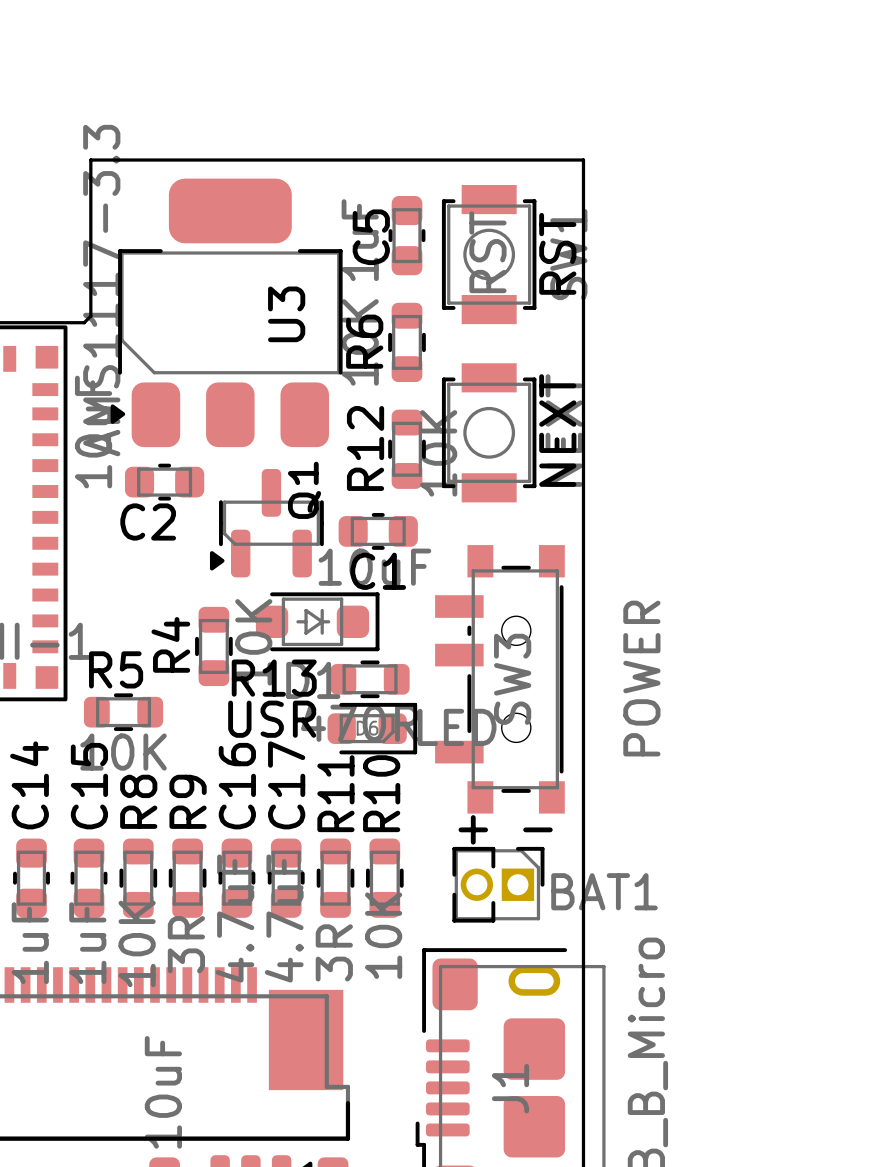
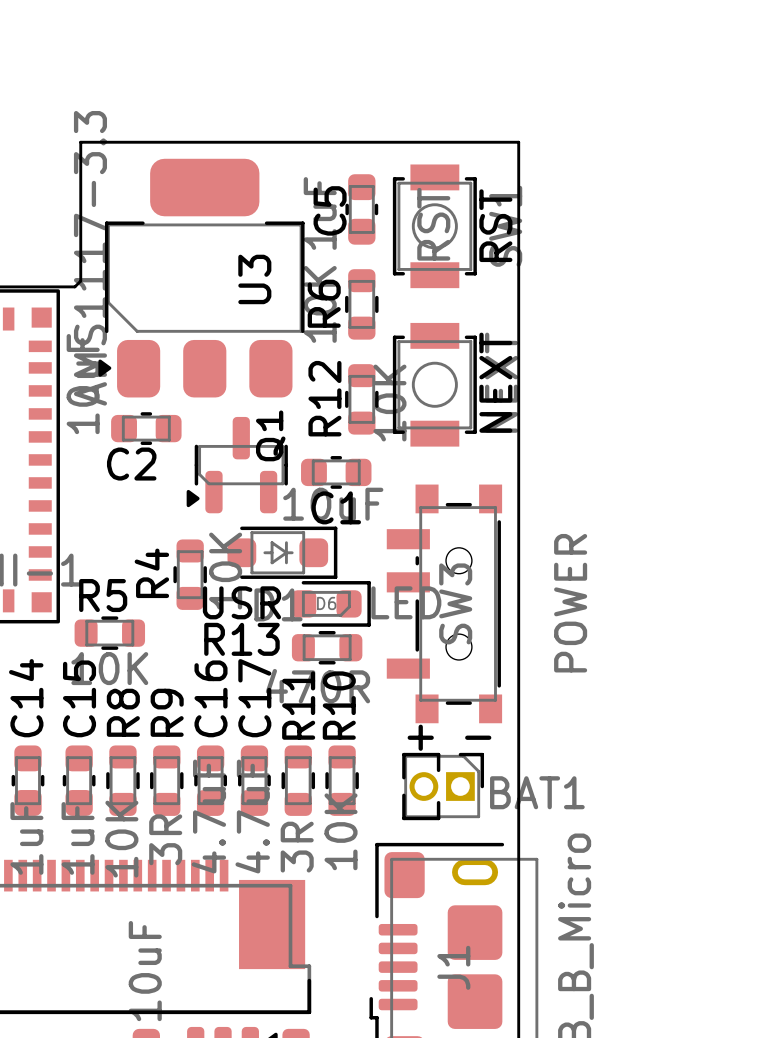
R13 name position: R13 (274, 678) -> R13 (241, 639)
R13 position: (370, 679) -> (327, 647)
text position: USR (272, 719) -> USR (241, 602)
D6 position: (372, 728) -> (331, 603)

